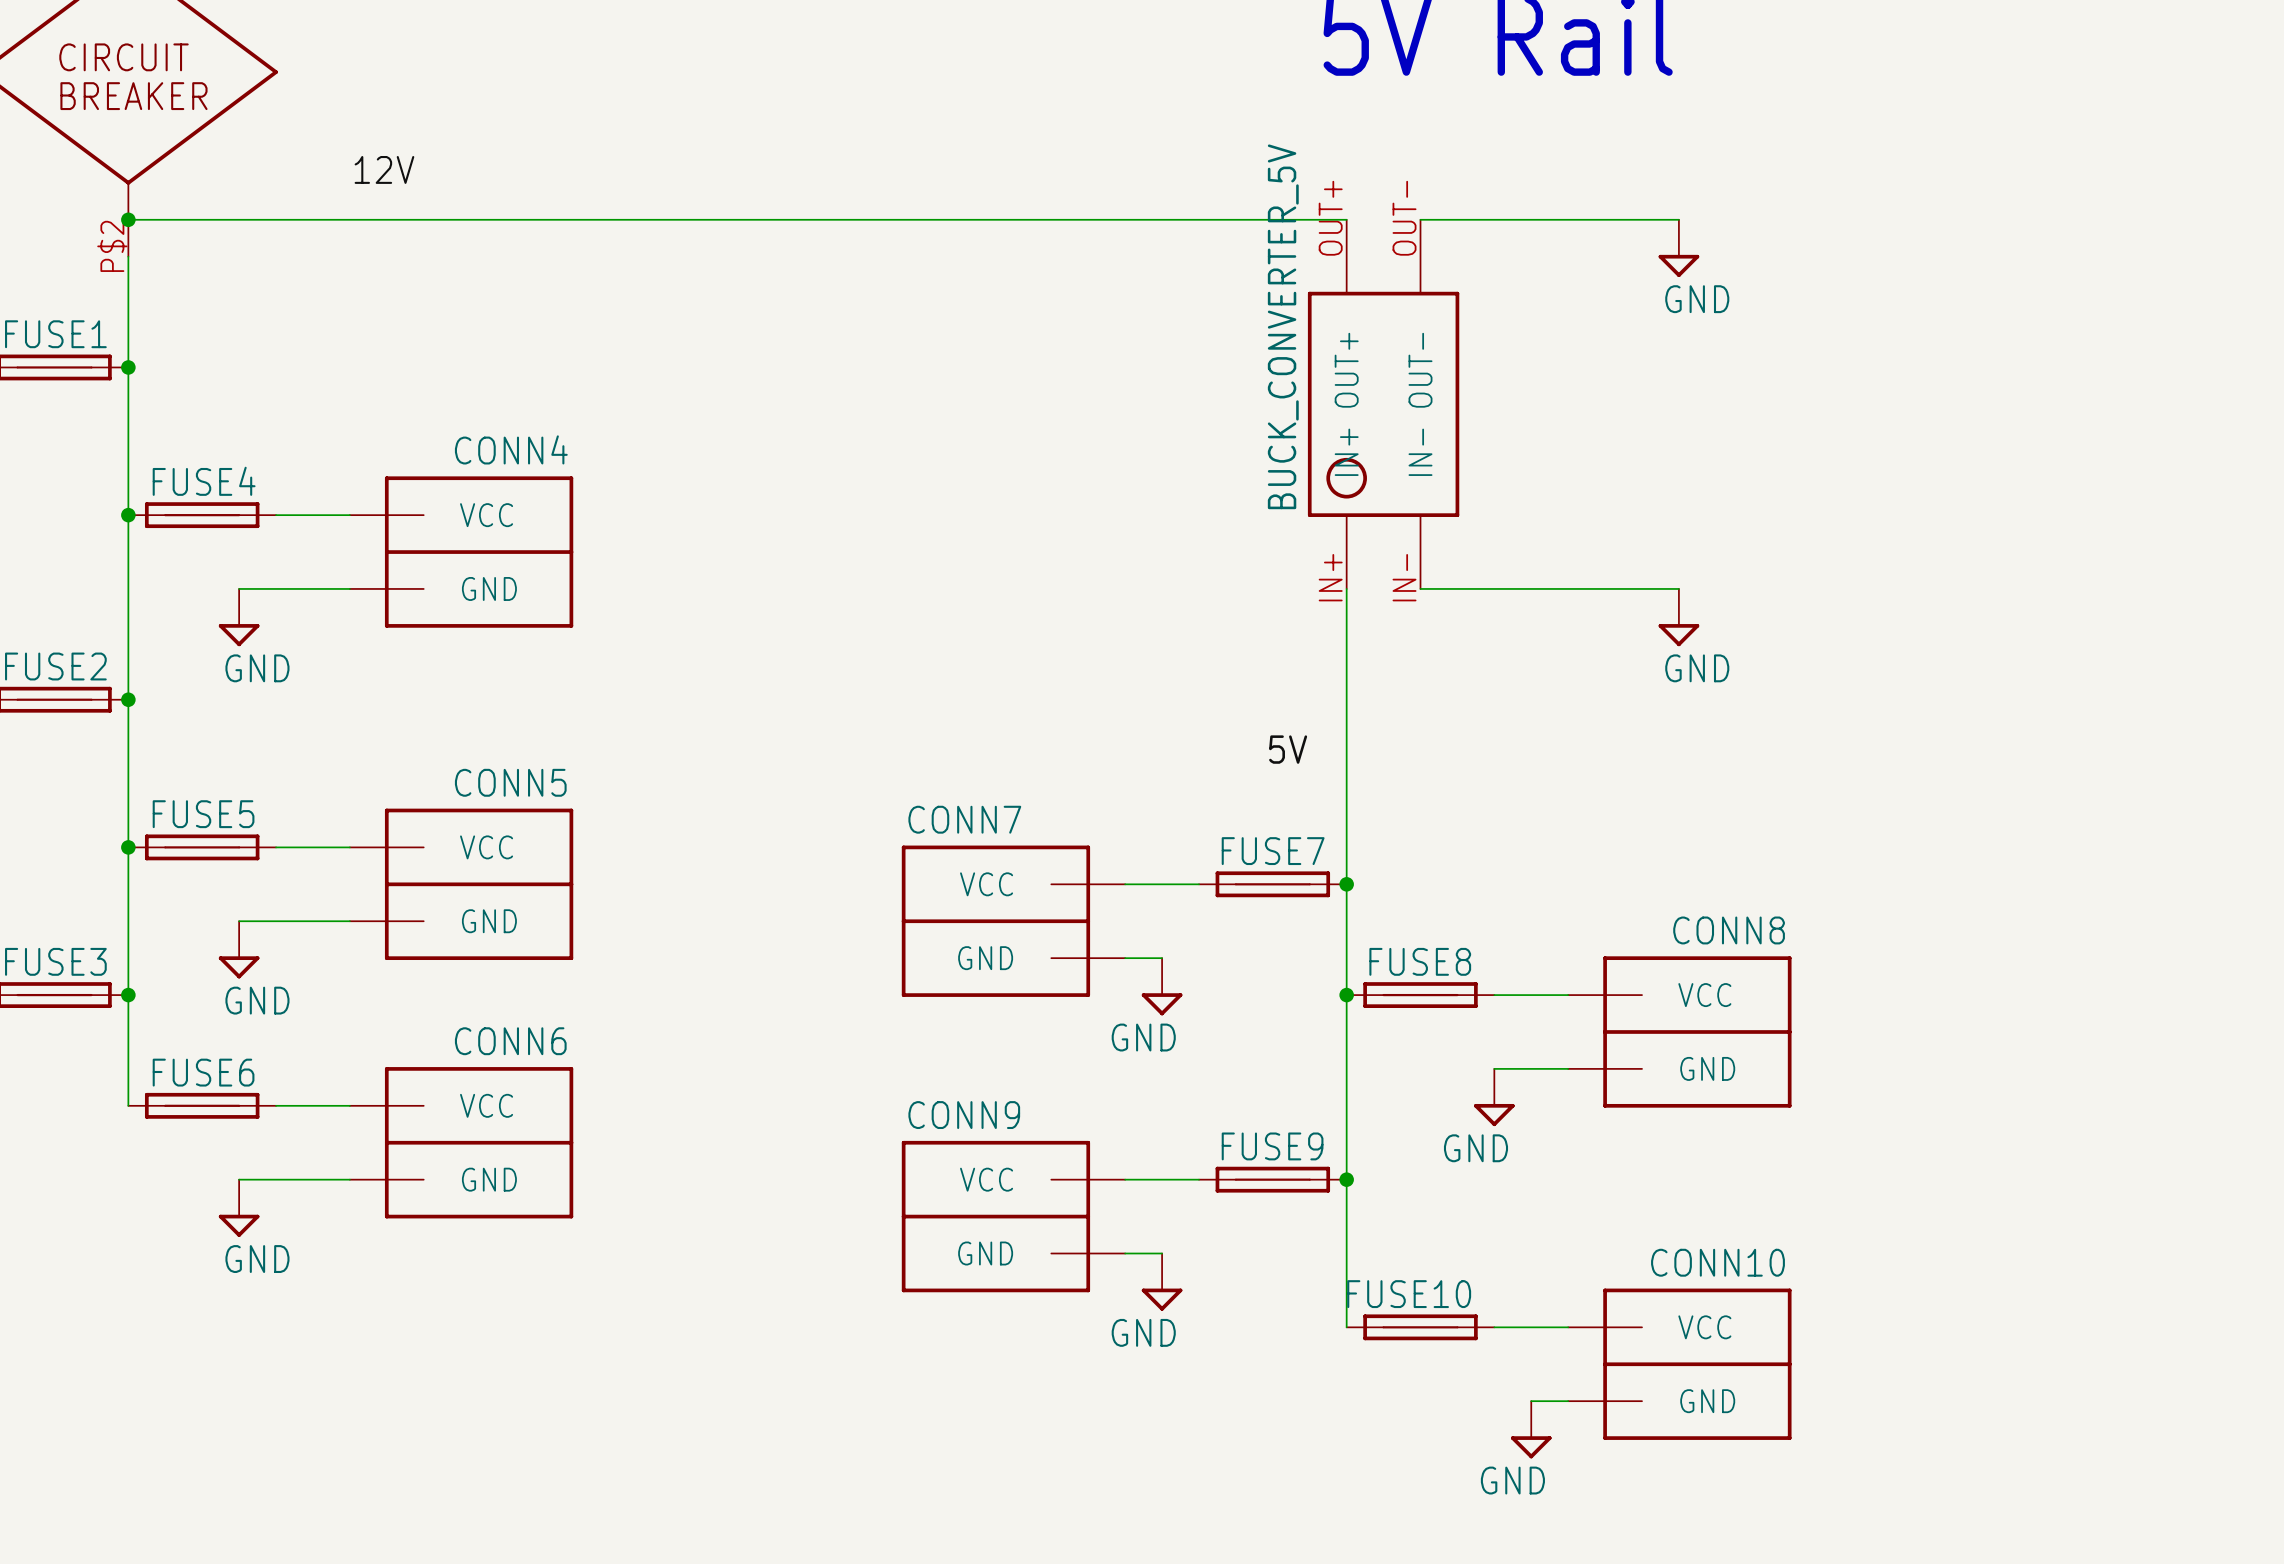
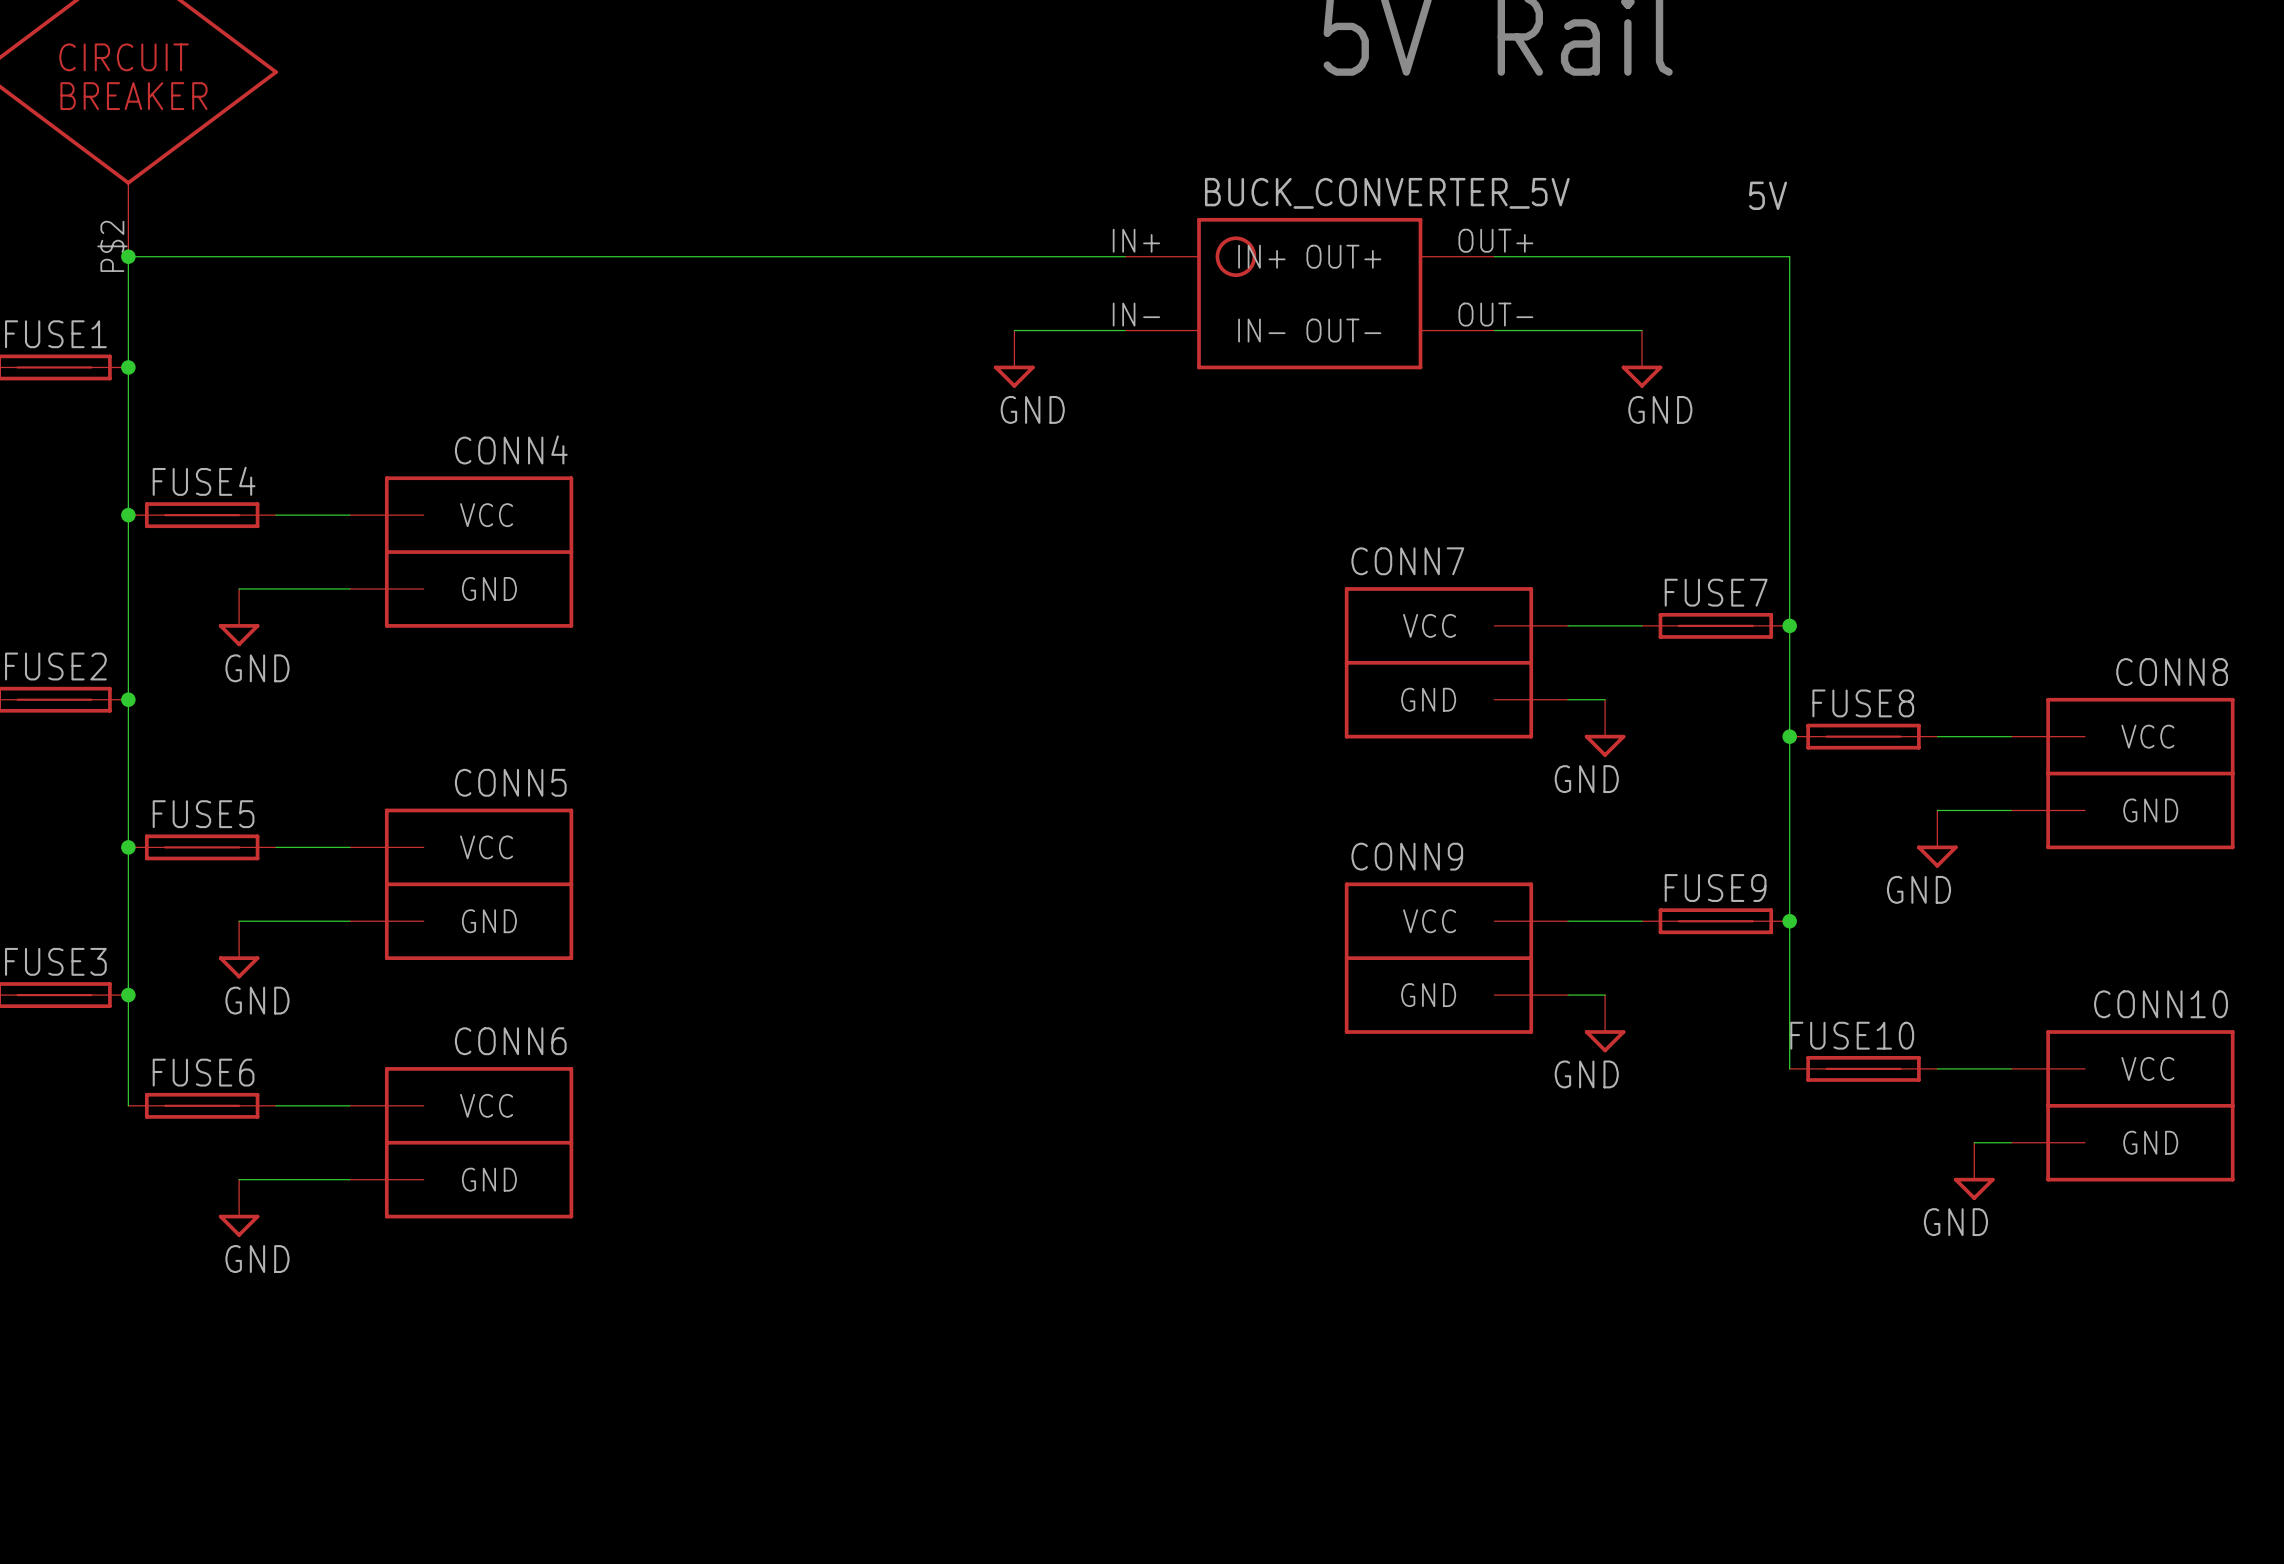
label: 12V (384, 169) -> none
label: none -> 5V (1768, 195)
wire: (128, 219) (1346, 219) -> none
junction position: (128, 219) -> (128, 256)
wire: (1420, 219) (1678, 219) -> none
power symbol position: GND (1678, 248) -> GND (1642, 359)
wire: none -> (128, 256) (1125, 256)
wire: none -> (1494, 256) (1789, 256) (1789, 1068)
wire: none -> (1014, 330) (1125, 330)
wire: none -> (1494, 330) (1642, 330)
power symbol: none -> GND (1014, 359)
part rotation: 0° (1383, 404) -> 90° clockwise (1309, 293)
wire: (1346, 588) (1346, 1327) -> none
wire: (1420, 588) (1678, 588) -> none
power symbol: GND (1678, 617) -> none
wire: none -> (1568, 625) (1642, 625)
junction: none -> (1789, 625)
wire: none -> (1568, 699) (1605, 699)
power symbol: none -> GND (1605, 728)
junction: none -> (1789, 736)
wire: none -> (1937, 736) (2011, 736)
label: 5V (1288, 749) -> none
wire: none -> (1937, 810) (2011, 810)
power symbol: none -> GND (1937, 839)
wire: (1125, 884) (1198, 884) -> none
FUSE7 position: (1272, 884) -> (1715, 625)
junction: (1346, 884) -> none
CONN7 position: (1013, 921) -> (1456, 662)
junction: none -> (1789, 921)
wire: (1125, 958) (1162, 958) -> none
power symbol: GND (1162, 986) -> none
junction: (1346, 995) -> none
FUSE8 position: (1420, 995) -> (1863, 736)
CONN8 position: (1679, 1031) -> (2122, 773)
wire: (1494, 1068) (1568, 1068) -> (1568, 921) (1642, 921)
wire: none -> (1937, 1068) (2011, 1068)
power symbol position: GND (1494, 1097) -> GND (1605, 1023)
wire: none -> (1974, 1142) (2011, 1142)
power symbol: none -> GND (1974, 1171)
wire: (1125, 1179) (1198, 1179) -> none
FUSE9 position: (1272, 1179) -> (1715, 921)
junction: (1346, 1179) -> none
CONN9 position: (1013, 1216) -> (1456, 958)
wire: (1125, 1253) (1162, 1253) -> none
power symbol: GND (1162, 1282) -> none
FUSE10 position: (1420, 1327) -> (1863, 1068)
wire: (1494, 1327) (1568, 1327) -> none
CONN10 position: (1679, 1364) -> (2122, 1105)
wire: (1531, 1401) (1568, 1401) -> none
power symbol: GND (1531, 1429) -> none

